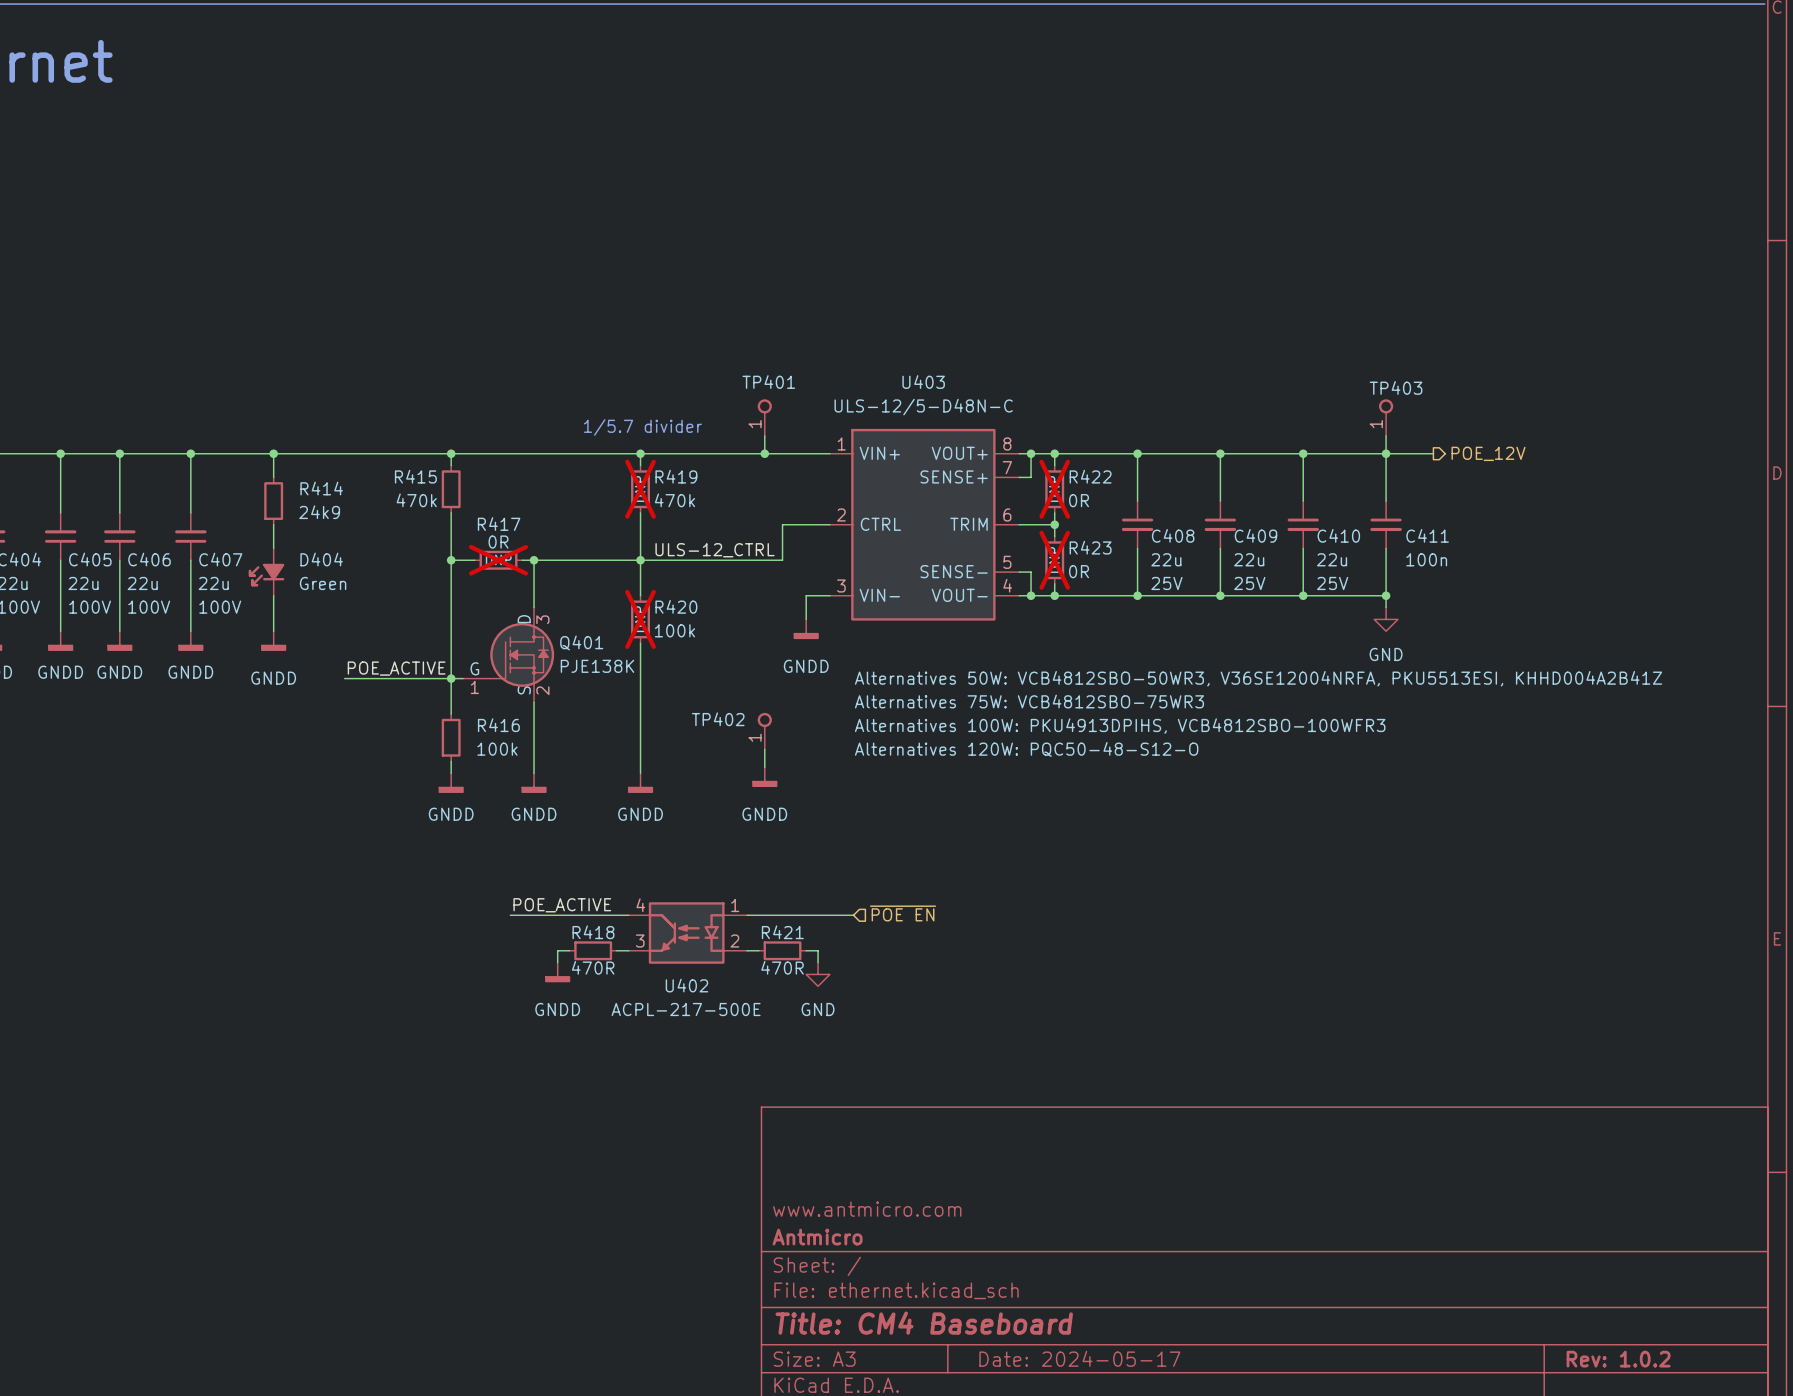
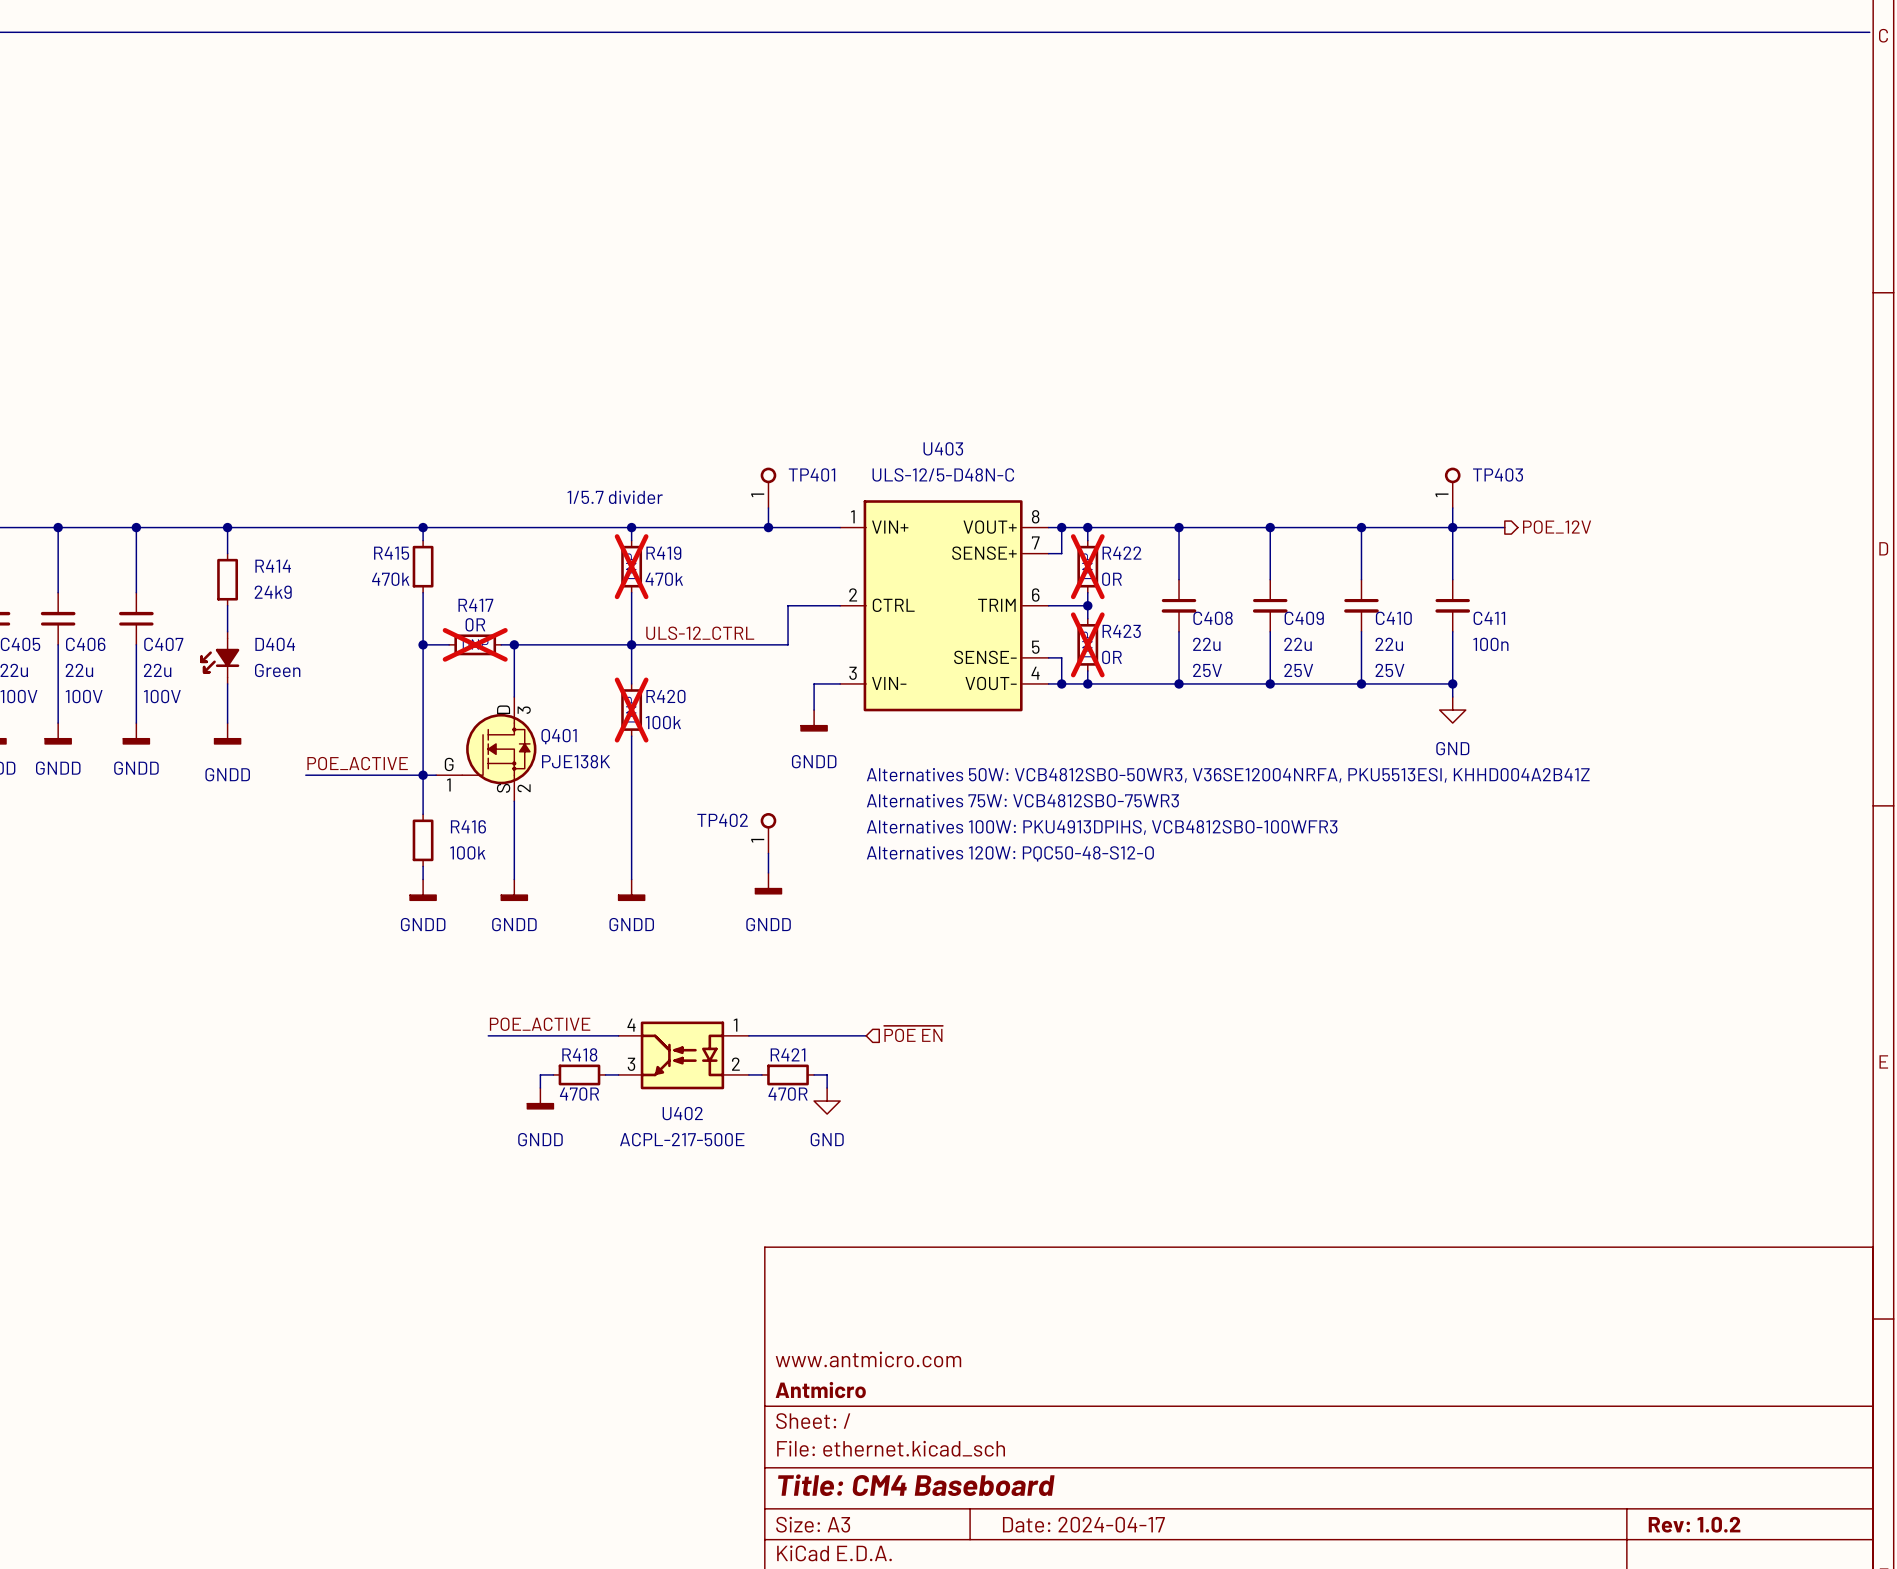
TP401 name position: TP401 (768, 382) -> TP401 (812, 474)
TP403 name position: TP403 (1396, 387) -> TP403 (1498, 474)
title block: Date: 2024-05-17 (1079, 1358) -> Date: 2024-04-17 (1083, 1524)

